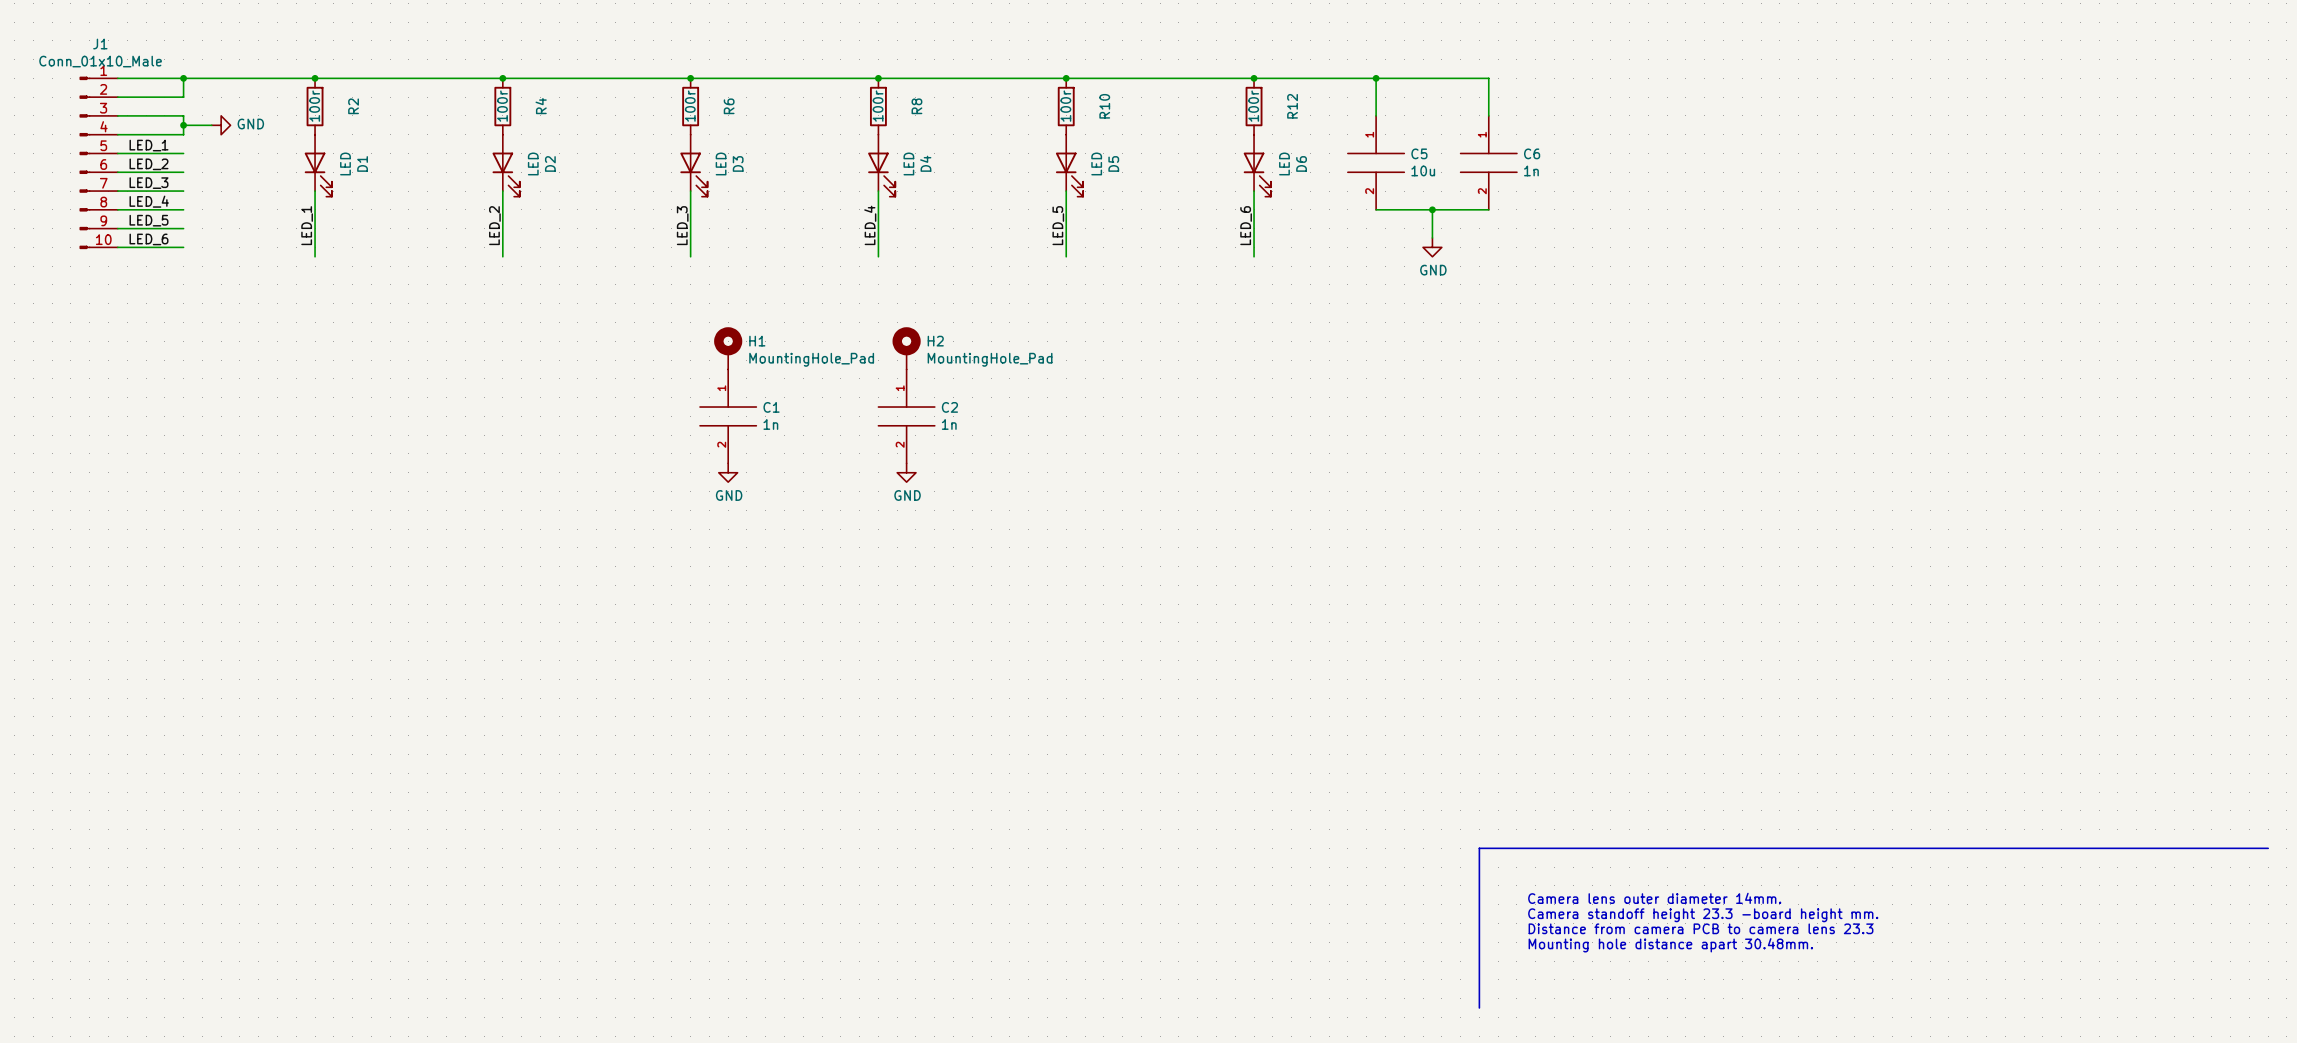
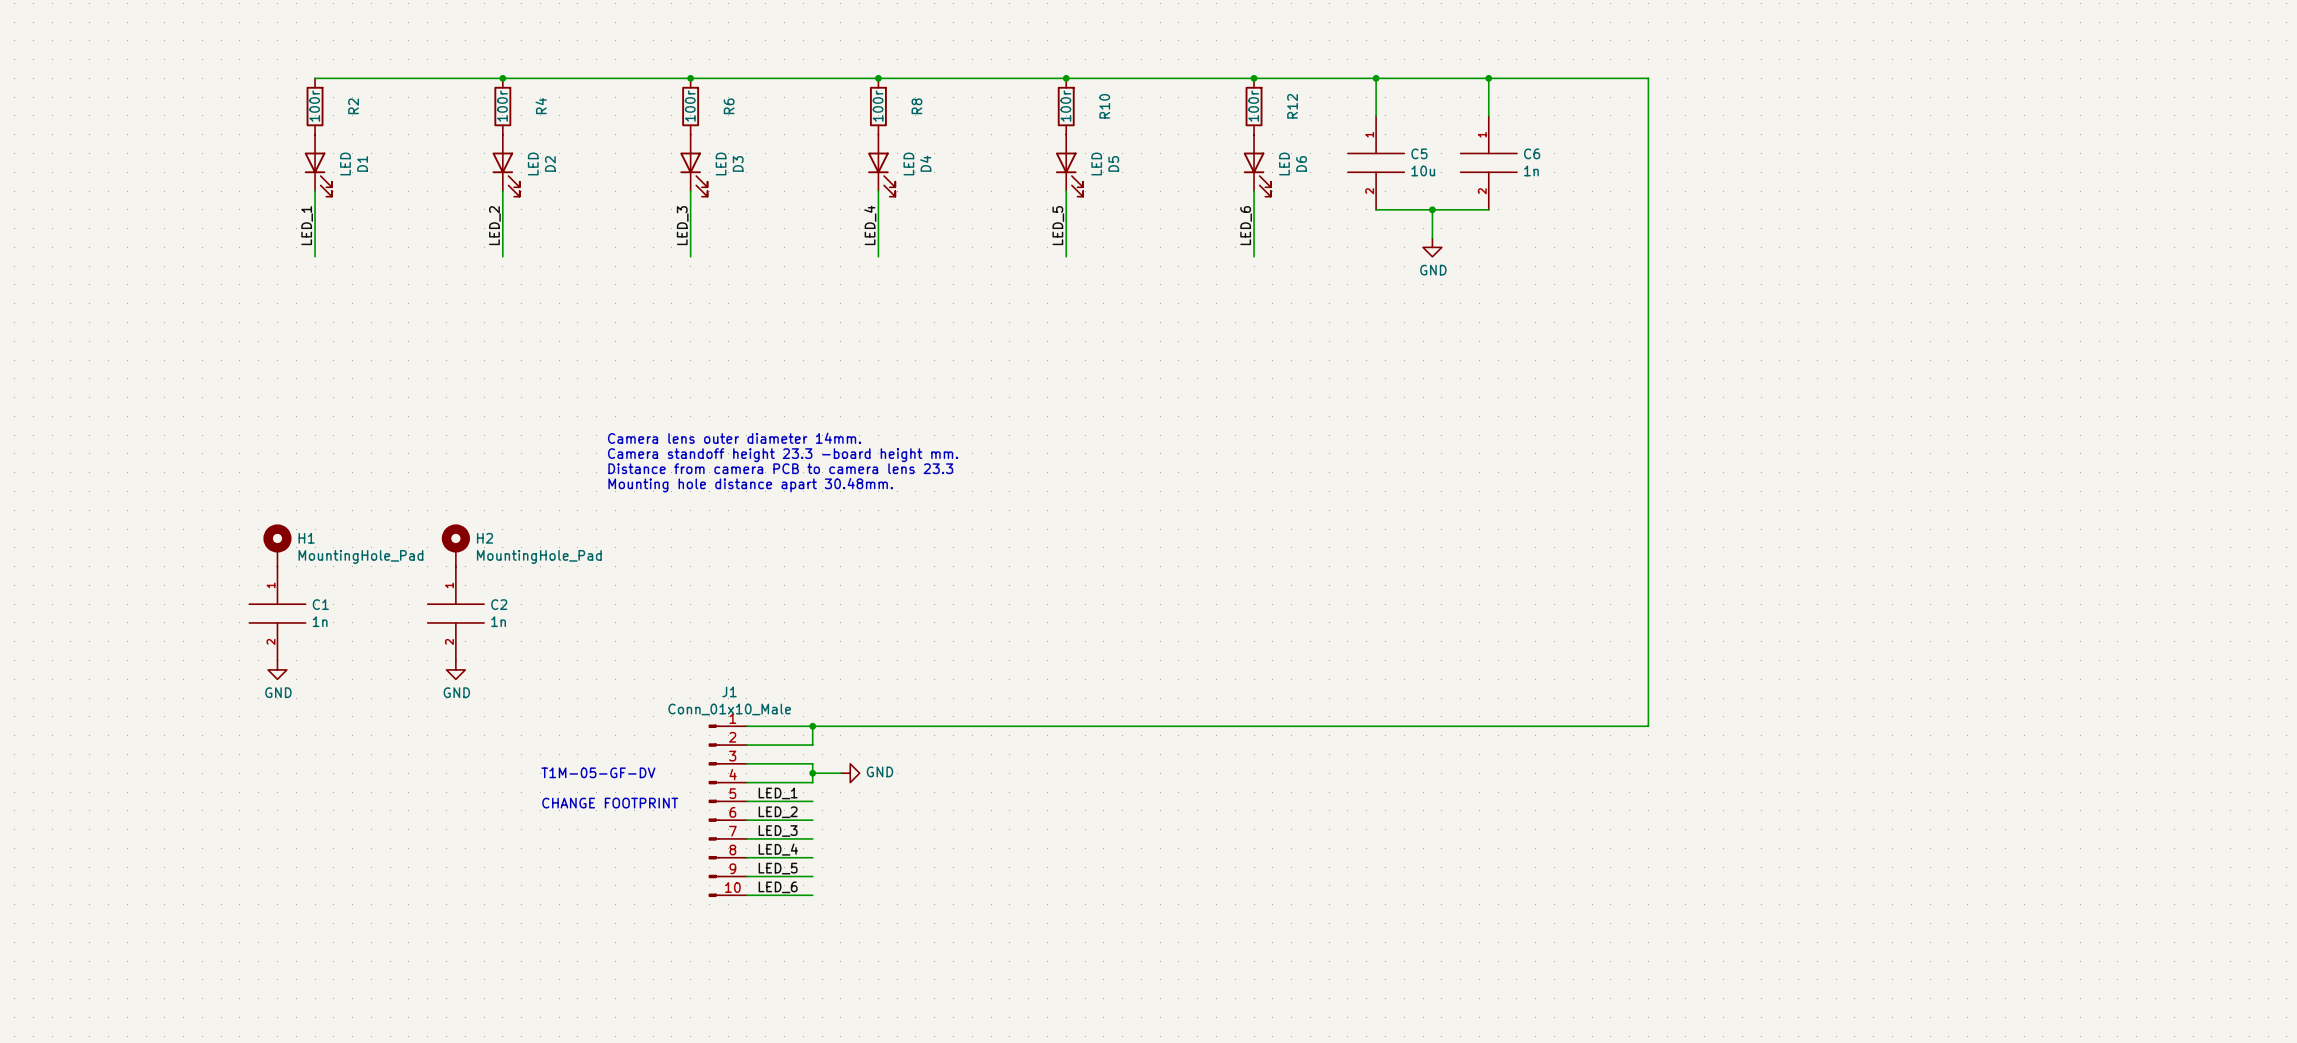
wire: (117, 78) (315, 78) -> none
wire: (183, 78) (183, 97) (117, 97) -> none
junction: (183, 78) -> none
junction: (315, 78) -> none
wire: none -> (1488, 78) (1648, 78) (1648, 726) (746, 726)
junction: none -> (1488, 78)
wire: (117, 115) (183, 115) (183, 134) (117, 134) -> none
wire: (183, 125) (211, 125) -> none
junction: (183, 125) -> none
power symbol: GND (221, 125) -> none
label: LED_1 (148, 145) -> none
wire: (117, 153) (183, 153) -> none
J1 position: (98, 162) -> (727, 810)
label: LED_2 (148, 164) -> none
wire: (117, 172) (183, 172) -> none
label: LED_3 (148, 183) -> none
wire: (117, 191) (183, 191) -> none
label: LED_4 (149, 201) -> none
wire: (117, 209) (183, 209) -> none
label: LED_5 (148, 220) -> none
wire: (117, 228) (183, 228) -> none
label: LED_6 (148, 239) -> none
wire: (117, 247) (183, 247) -> none
H1 position: (728, 348) -> (277, 545)
H2 position: (906, 348) -> (455, 545)
C1 position: (728, 416) -> (277, 613)
C2 position: (906, 416) -> (455, 613)
text: none -> Camera lens outer diameter 14mm. (734, 438)
text: none -> Camera standoff height 23.3 -board height mm. (783, 455)
text: none -> Distance from camera PCB to camera lens 23.3 (780, 468)
power symbol: GND (728, 472) -> none
power symbol: GND (906, 472) -> none
text: none -> Mounting hole distance apart 30.48mm. (750, 485)
power symbol: none -> GND (277, 669)
power symbol: none -> GND (455, 669)
wire: none -> (812, 726) (812, 745) (746, 745)
junction: none -> (812, 726)
wire: none -> (746, 763) (812, 763) (812, 782) (746, 782)
text: none -> T1M-05-GF-DV (598, 772)
wire: none -> (812, 773) (840, 773)
junction: none -> (812, 773)
power symbol: none -> GND (850, 773)
label: none -> LED_1 (778, 793)
wire: none -> (746, 801) (812, 801)
text: none -> CHANGE FOOTPRINT (610, 803)
label: none -> LED_2 (778, 812)
wire: none -> (746, 820) (812, 820)
label: none -> LED_3 (778, 831)
wire: none -> (746, 838) (812, 838)
line: (2268, 848) (1479, 848) (1479, 1007) -> none
label: none -> LED_4 (778, 849)
wire: none -> (746, 857) (812, 857)
label: none -> LED_5 (778, 868)
wire: none -> (746, 876) (812, 876)
label: none -> LED_6 (778, 887)
wire: none -> (746, 895) (812, 895)
text: Camera lens outer diameter 14mm. (1654, 898) -> none
text: Camera standoff height 23.3 -board height mm. (1703, 915) -> none
text: Distance from camera PCB to camera lens 23.3 (1701, 928) -> none
text: Mounting hole distance apart 30.48mm. (1670, 945) -> none

